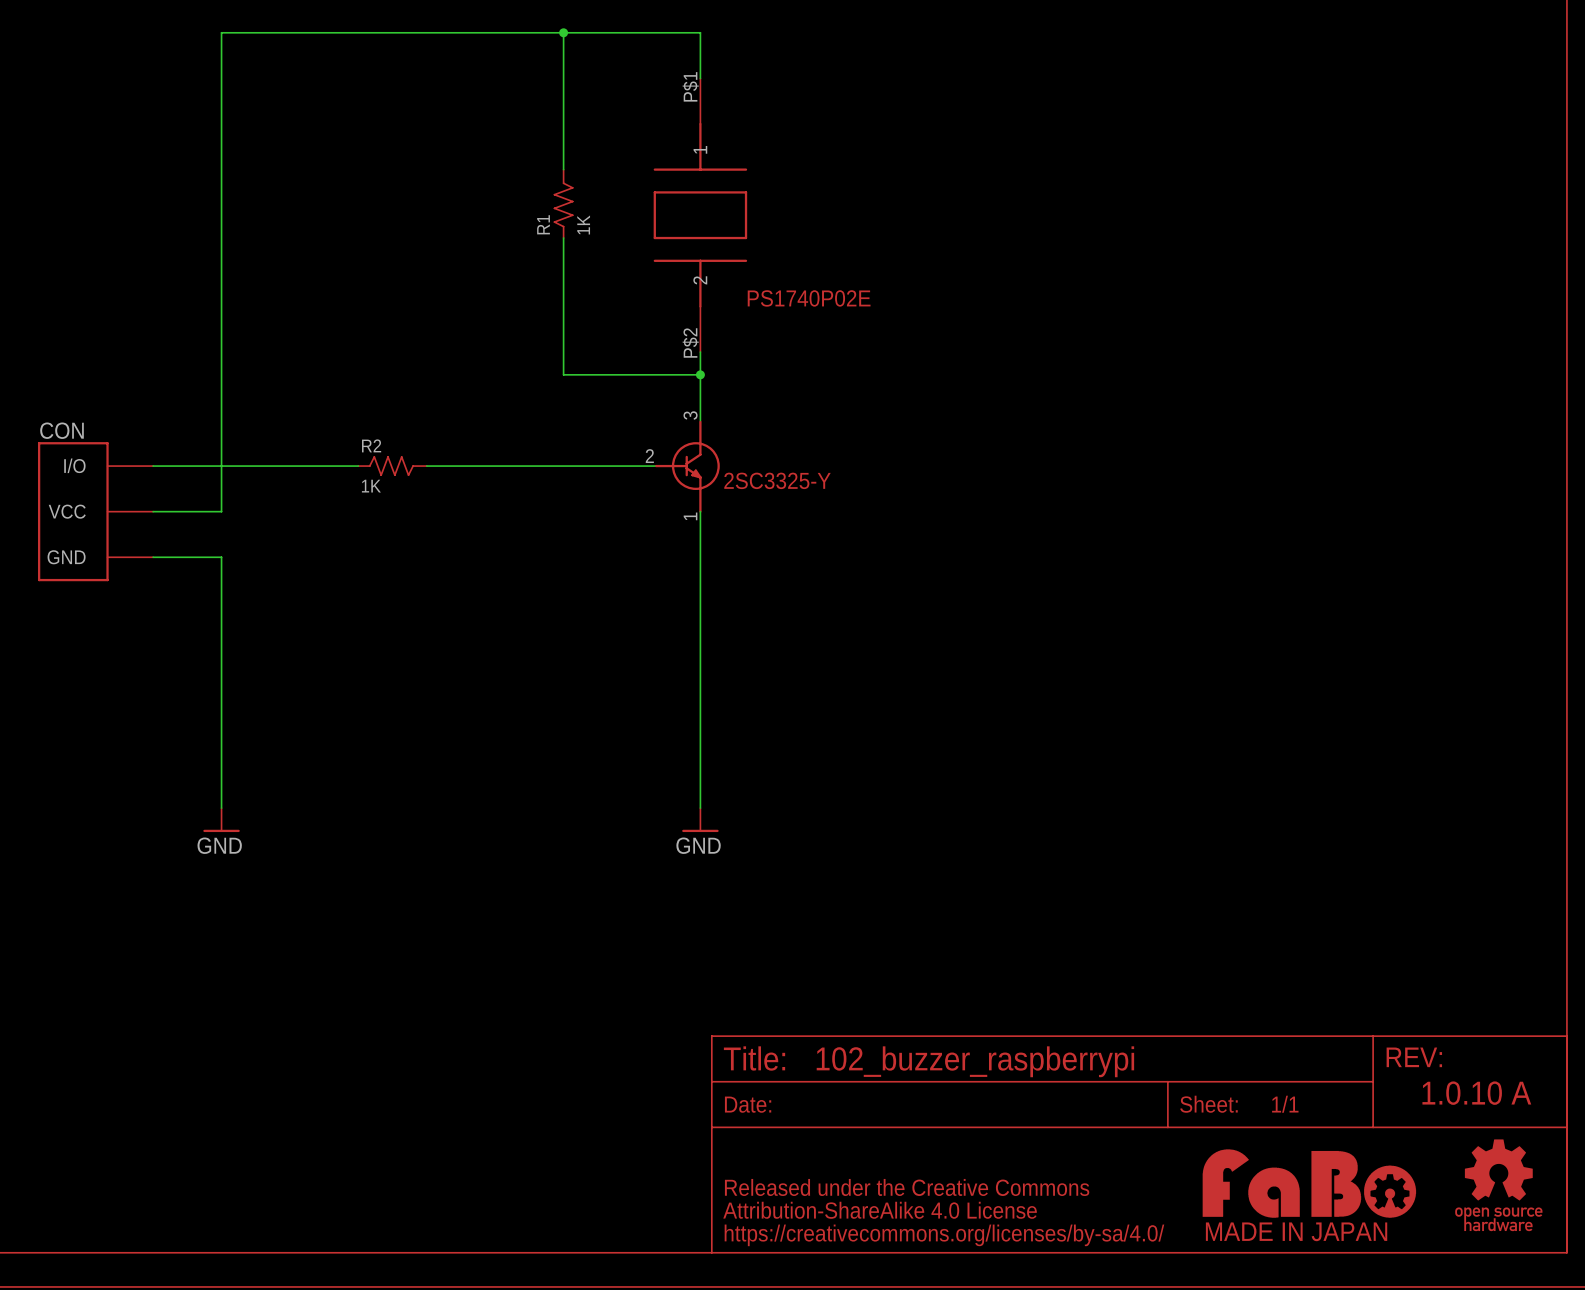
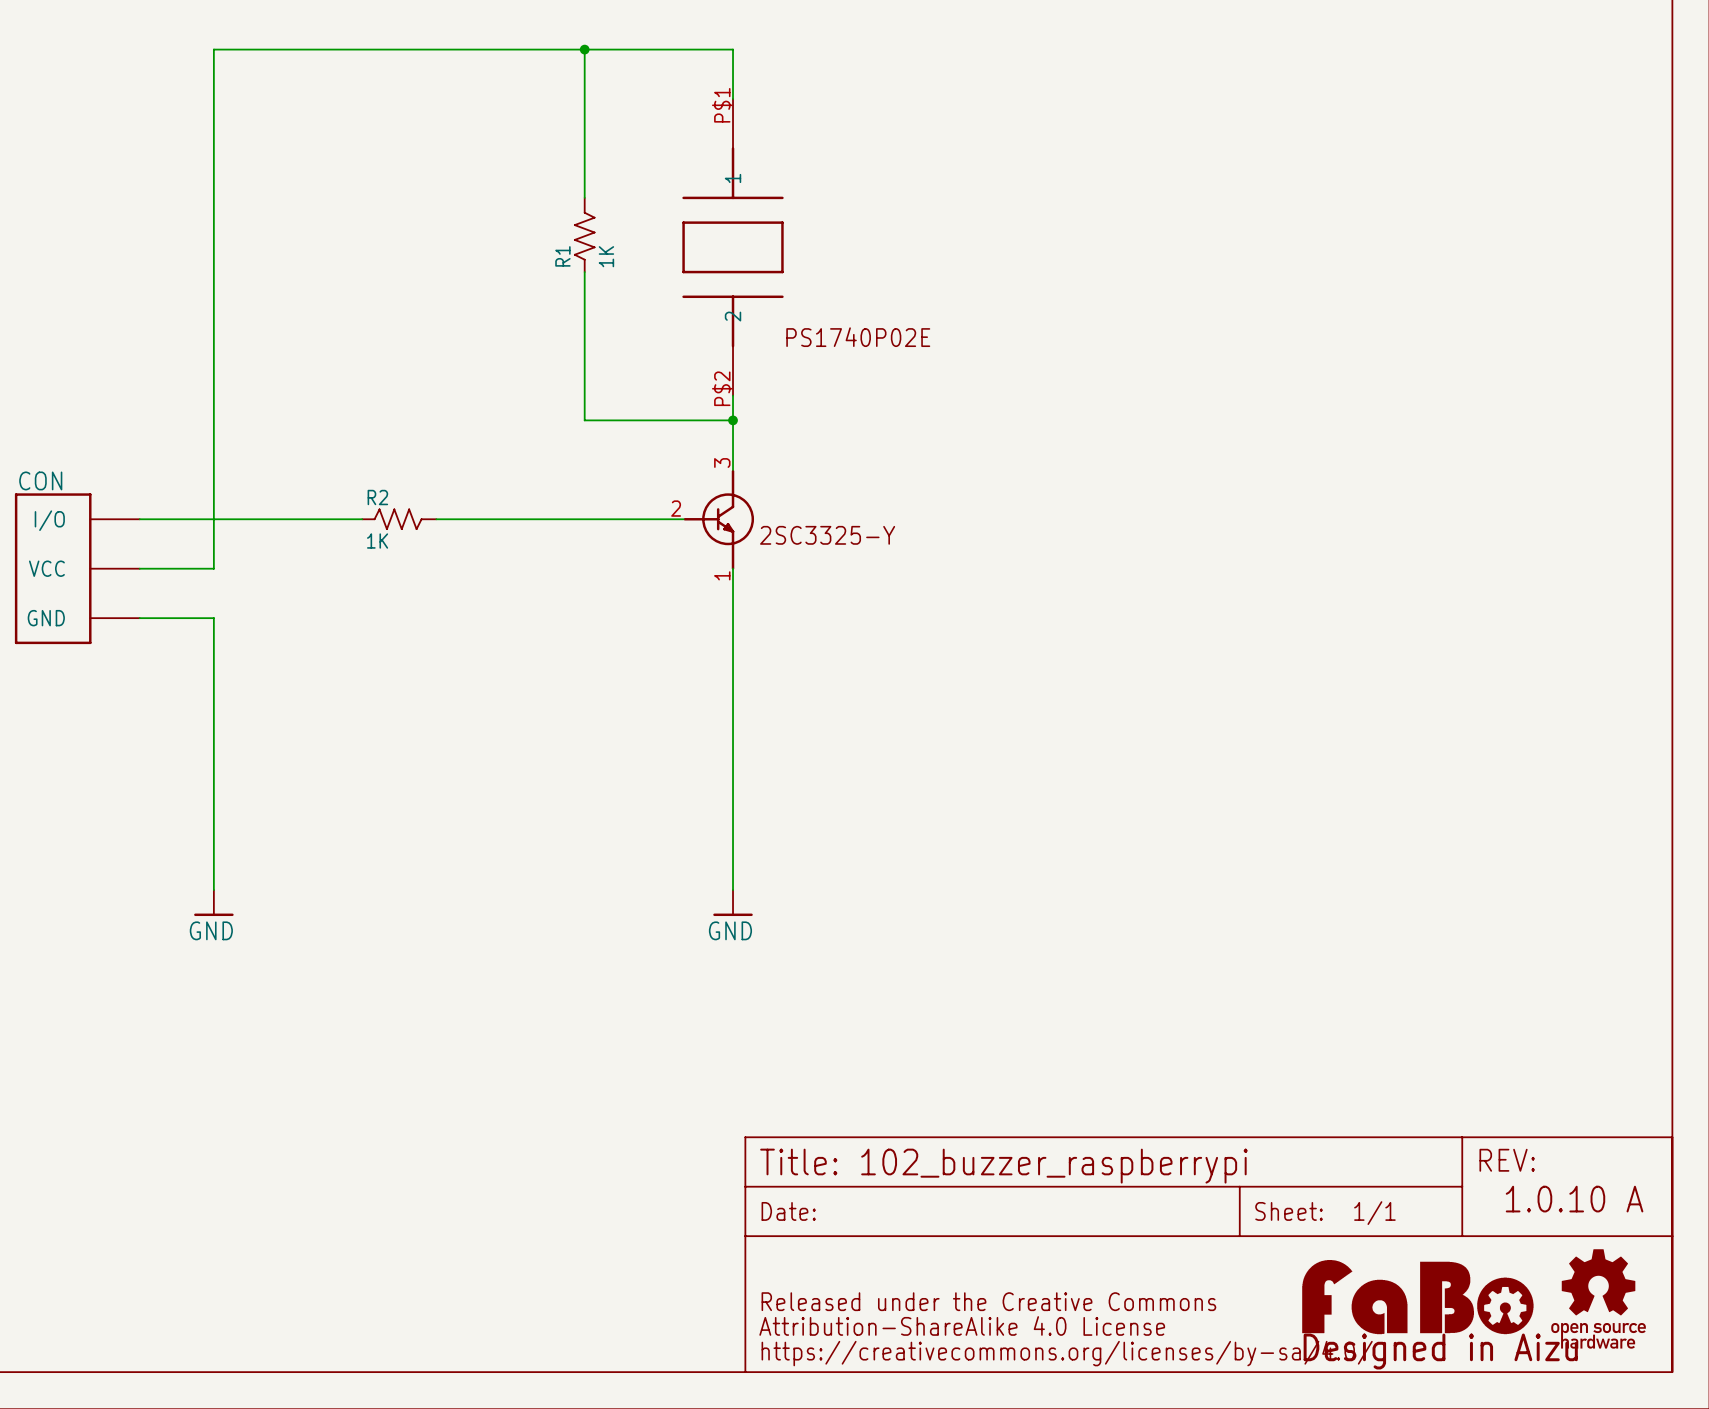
part: (1309, 1183) -> none
part: none -> (1417, 1297)

